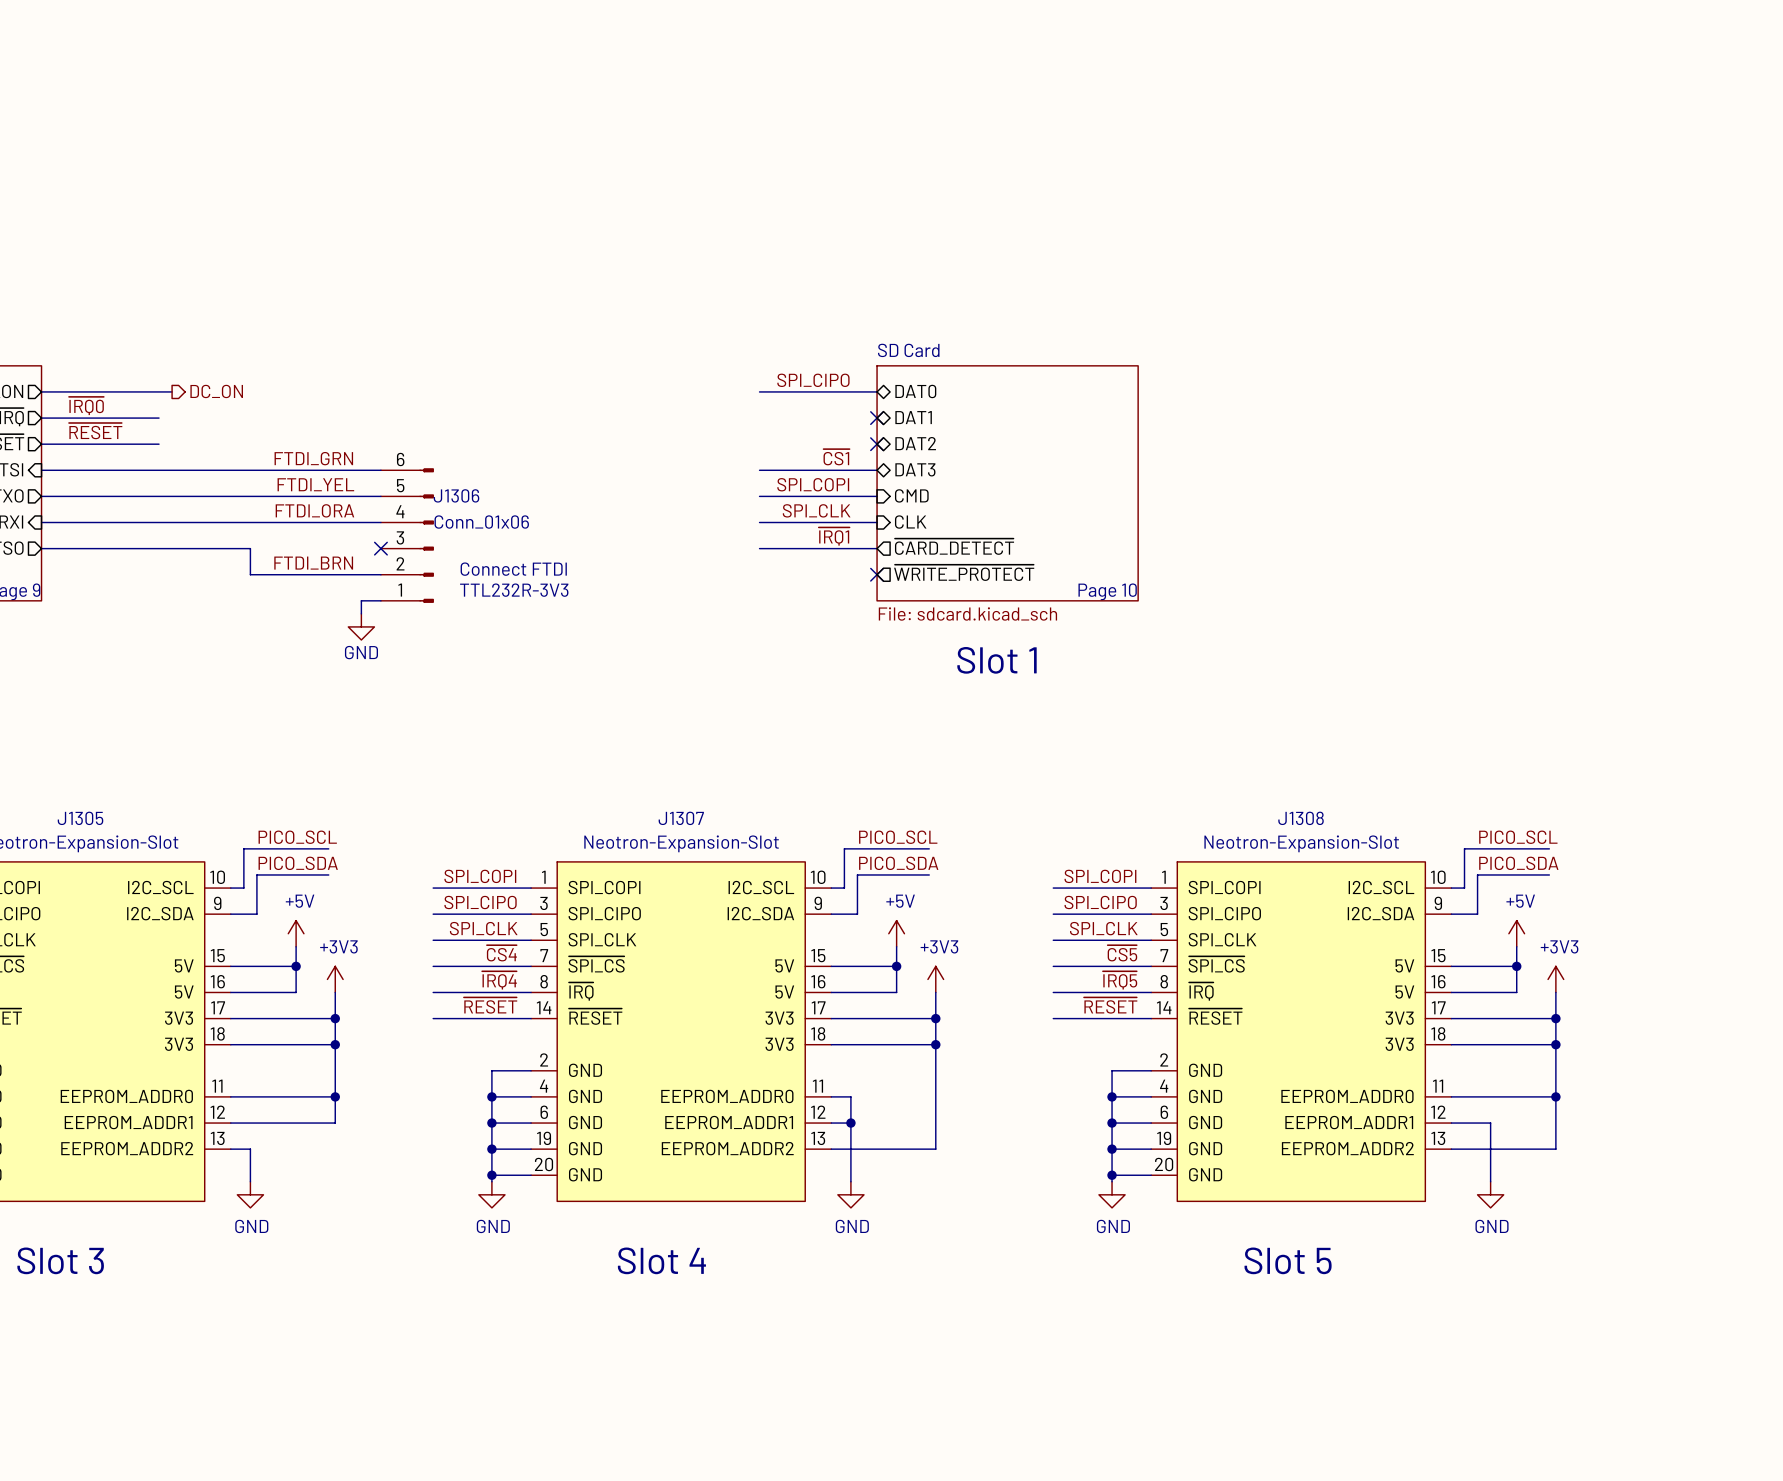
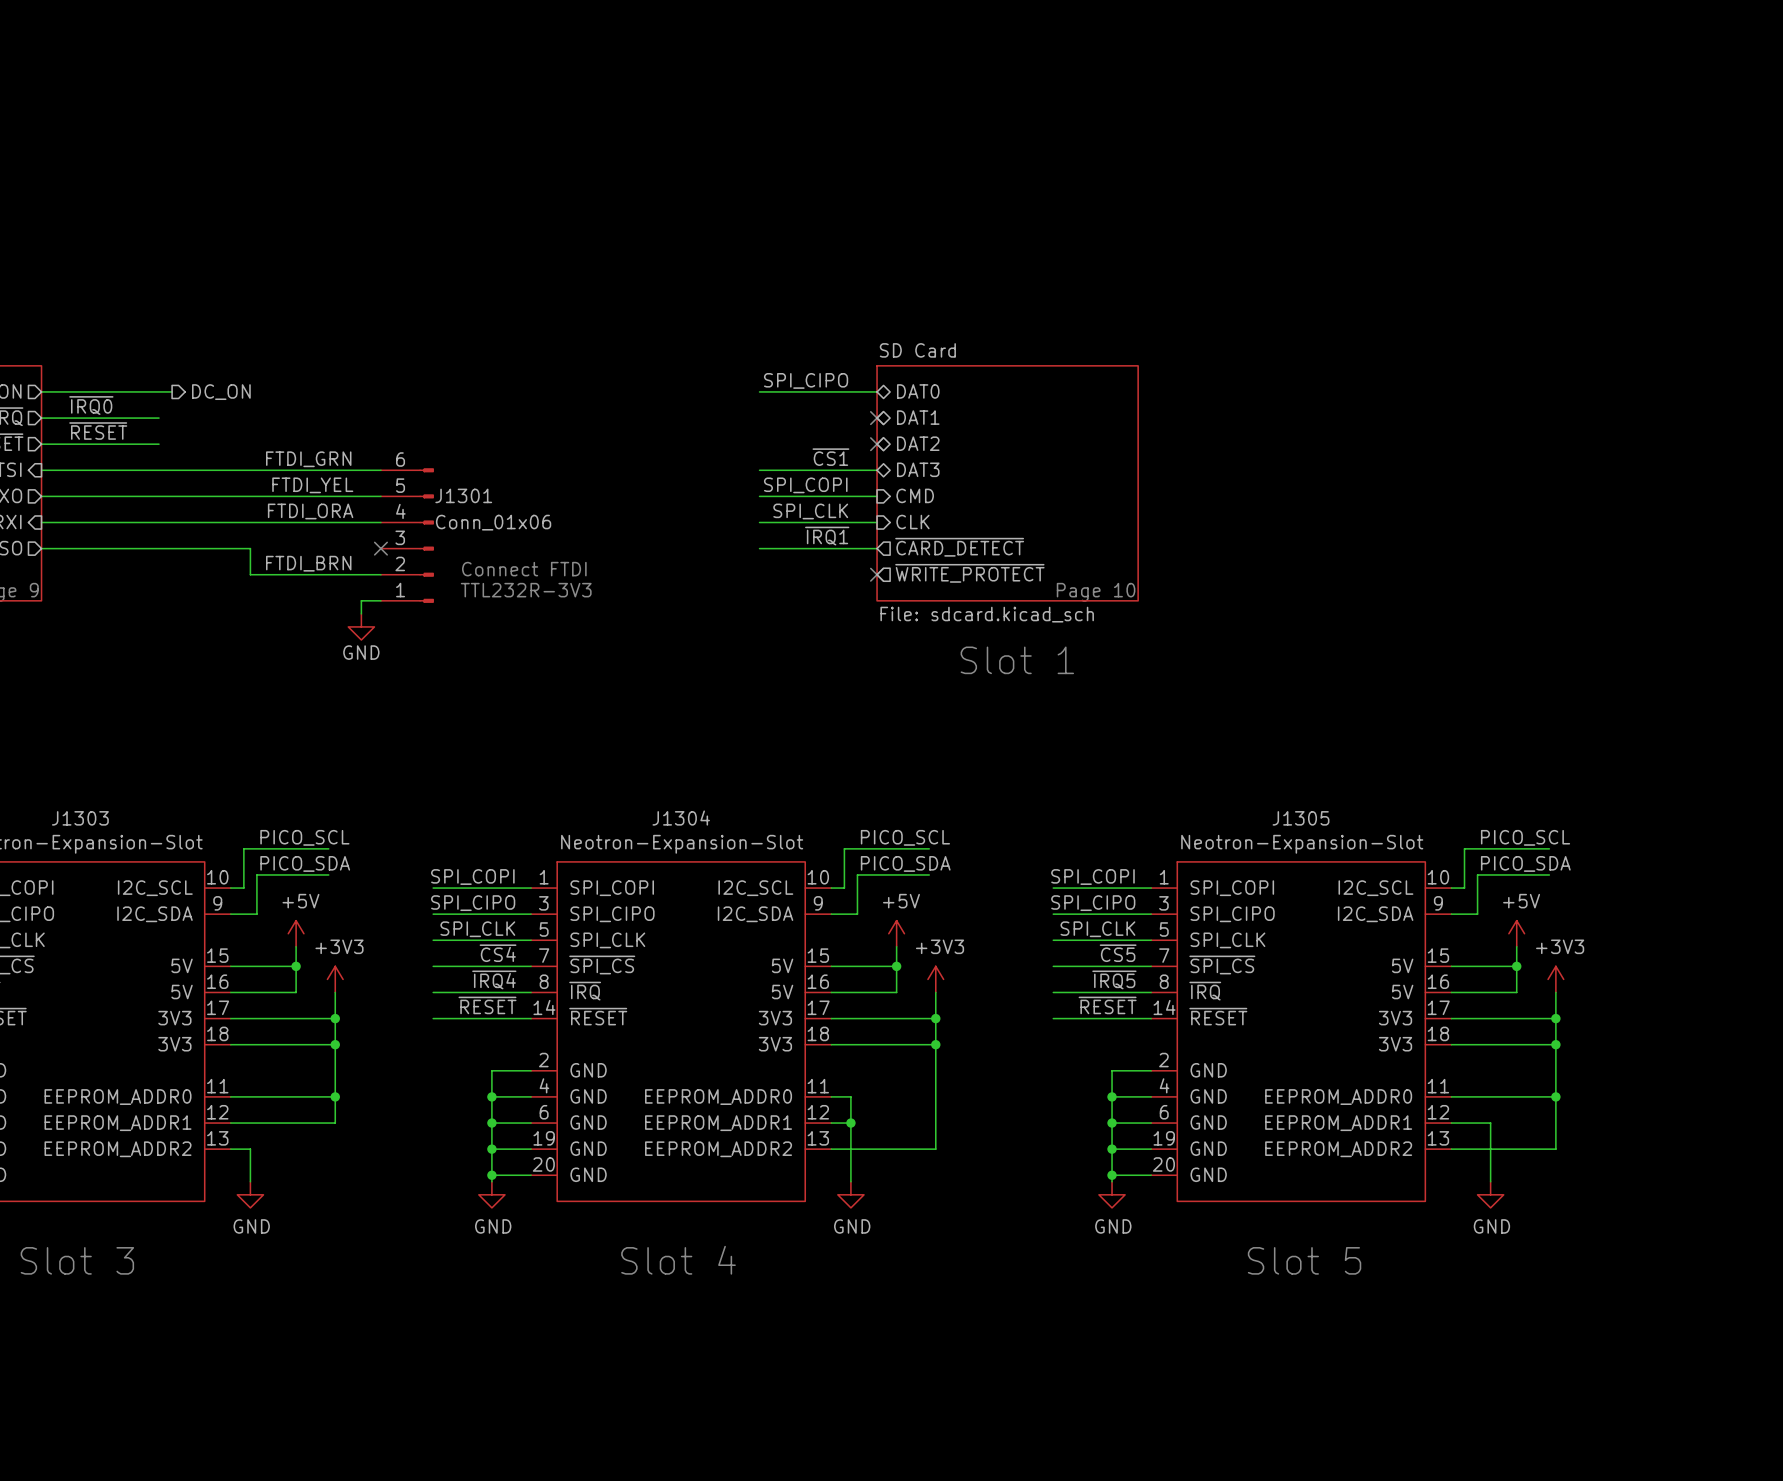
J1306 name: J1306 (456, 495) -> J1301 (463, 495)
J1305 name: J1305 (80, 818) -> J1303 (80, 818)
J1307 name: J1307 (681, 818) -> J1304 (681, 818)
J1308 name: J1308 (1301, 818) -> J1305 (1301, 818)

